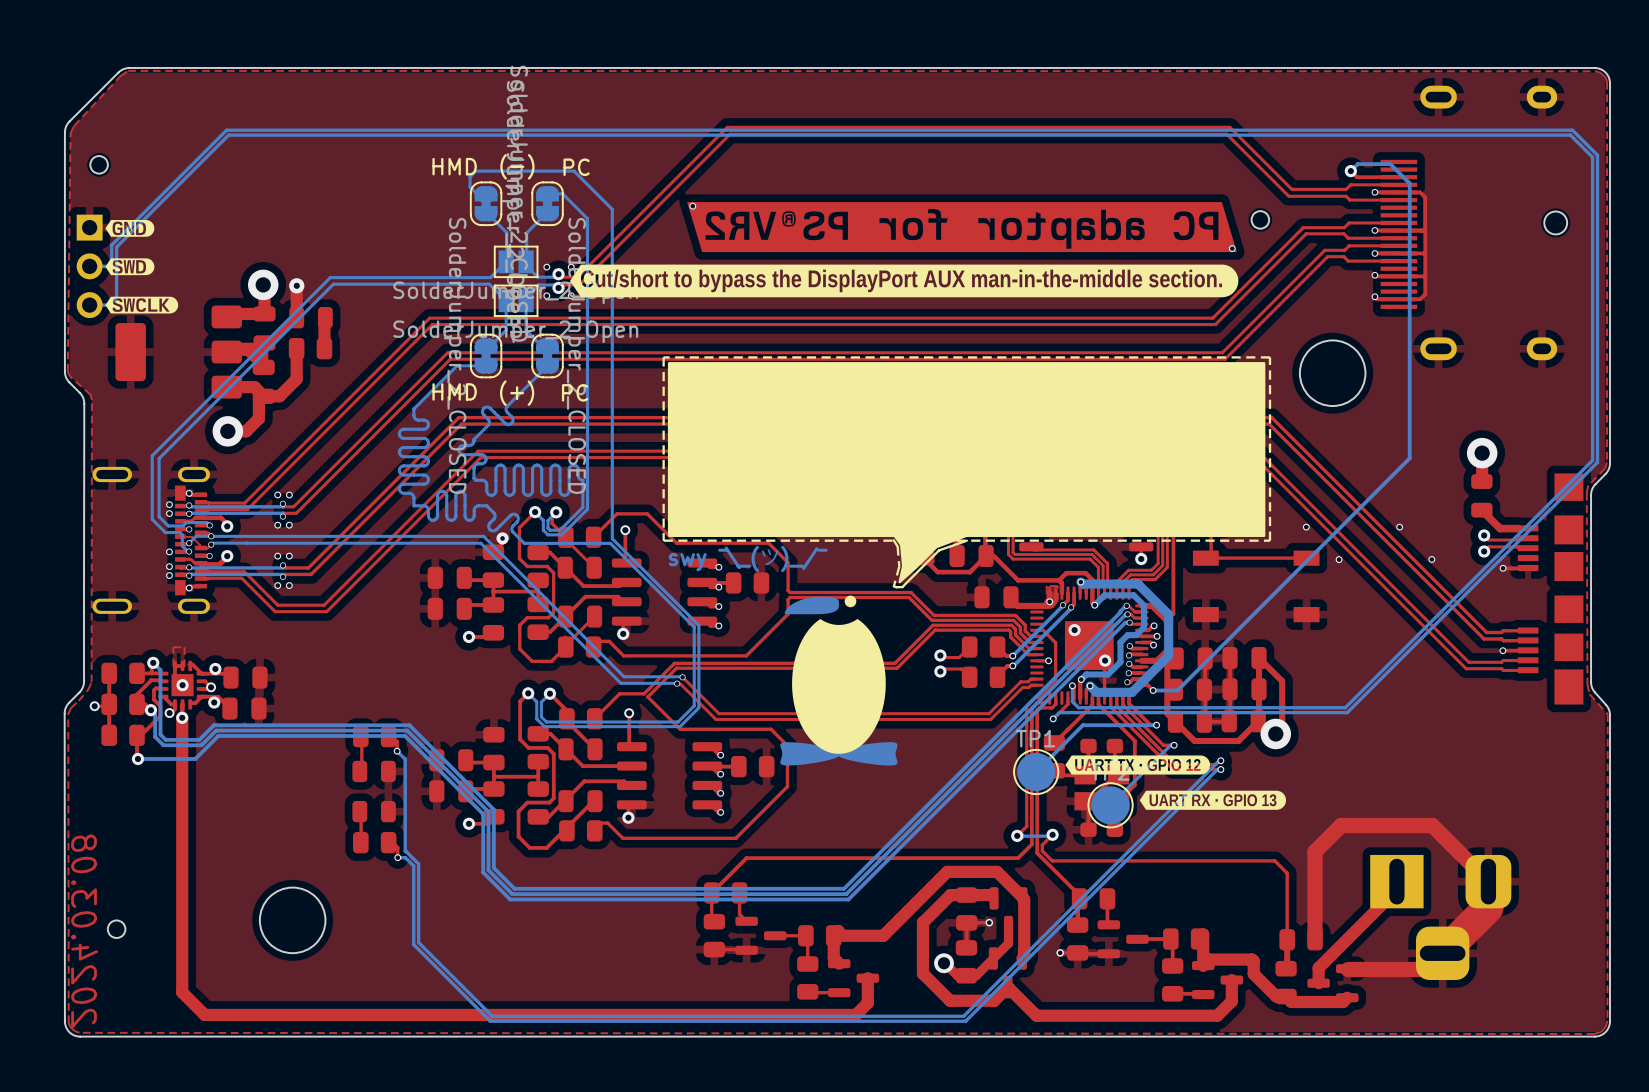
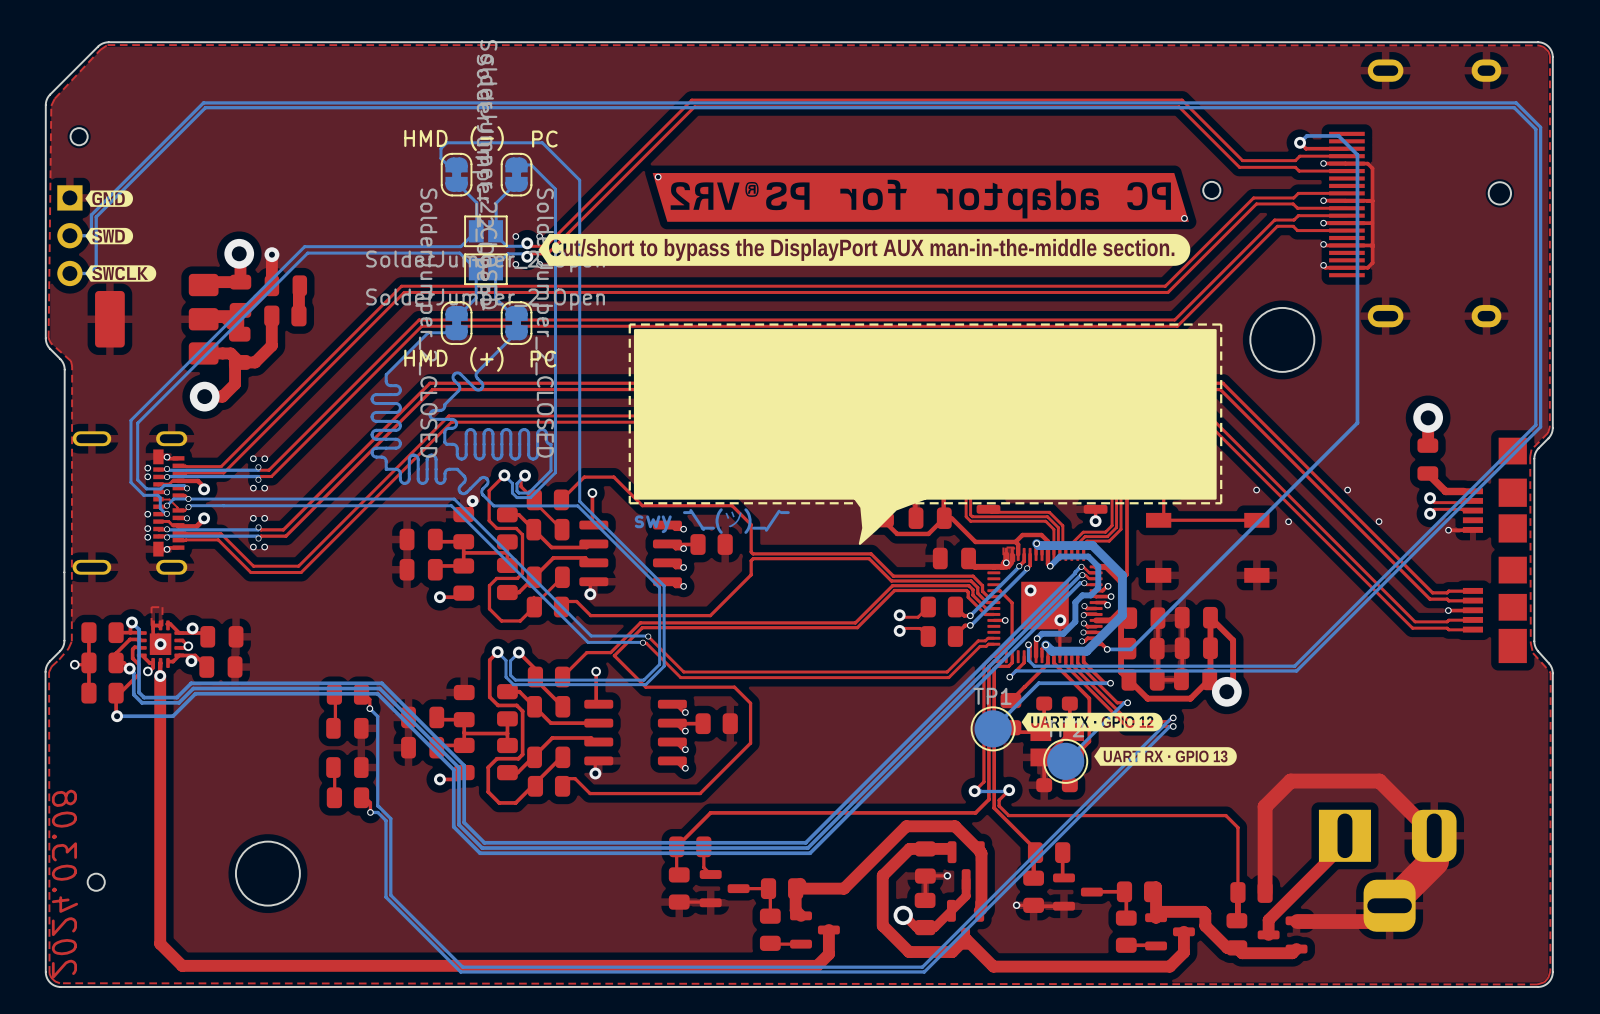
line: (893, 540) (897, 546) (899, 566) (893, 586) (896, 587) (902, 587) (938, 550) (966, 540) -> none
drawing: [780, 595, 898, 766] -> none

